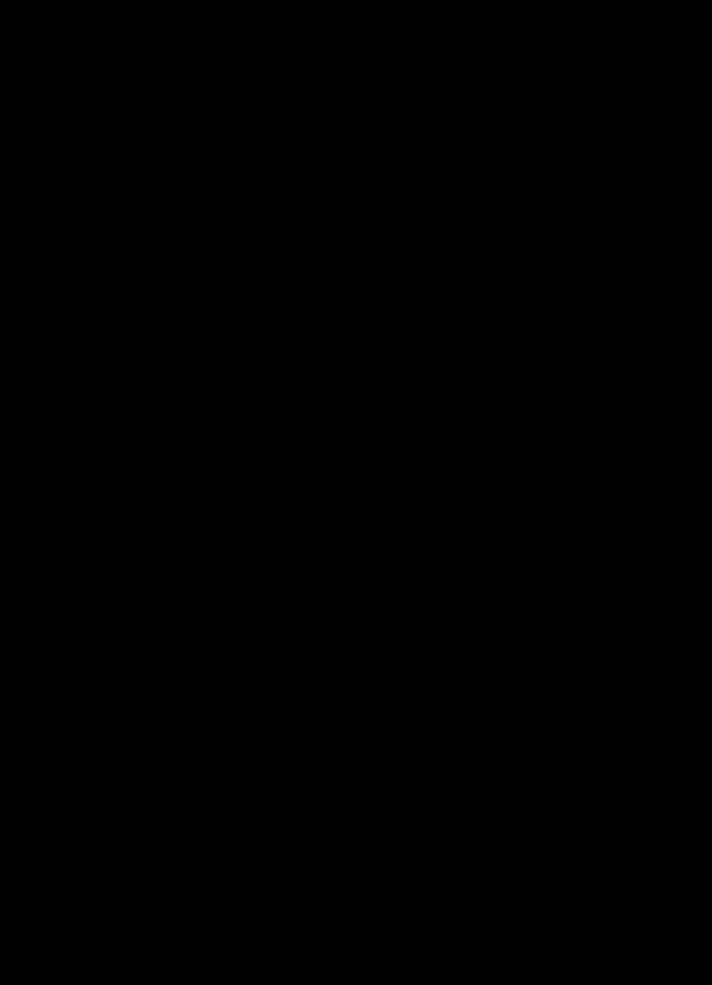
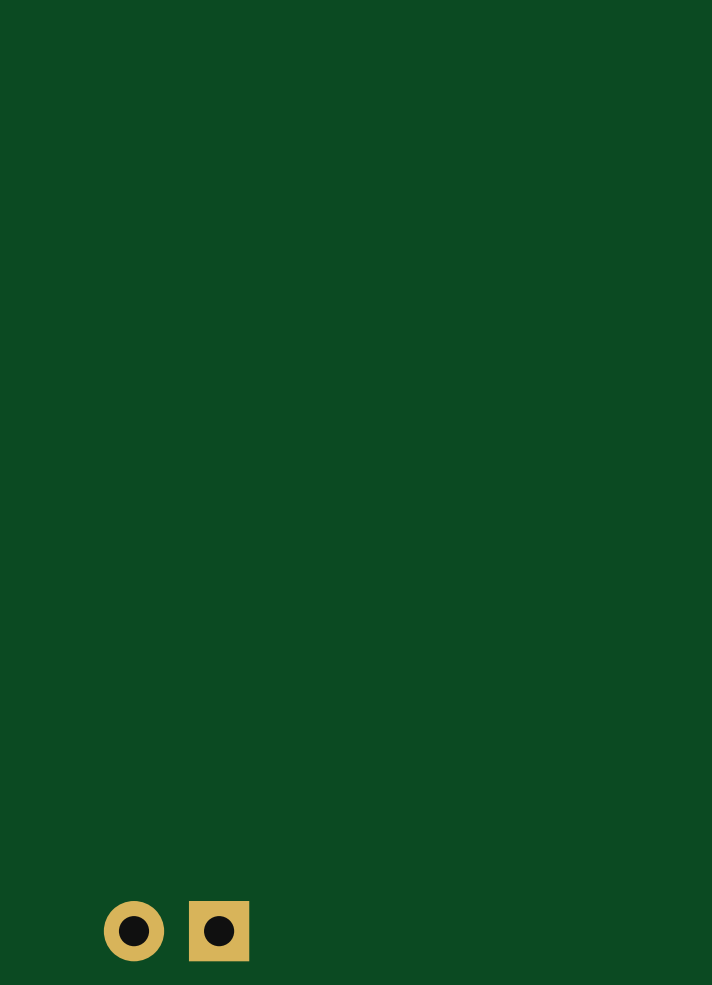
part: none -> (176, 931)

